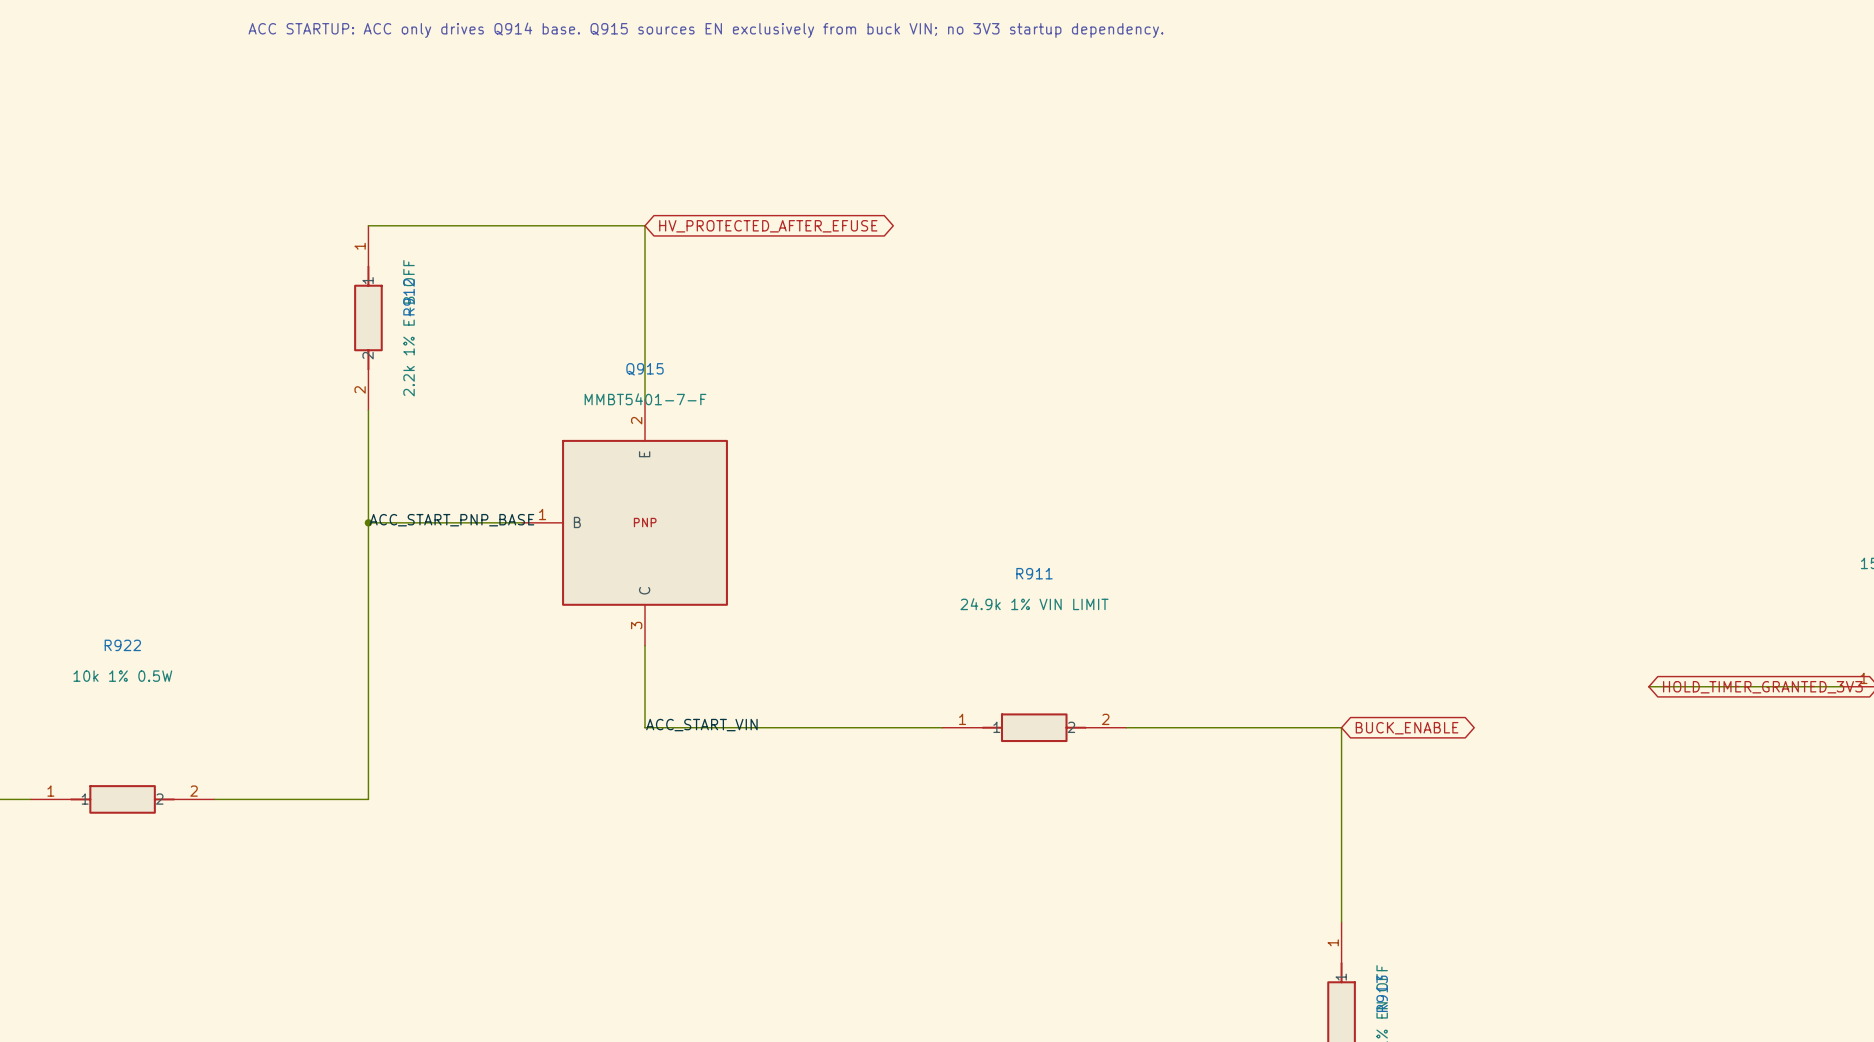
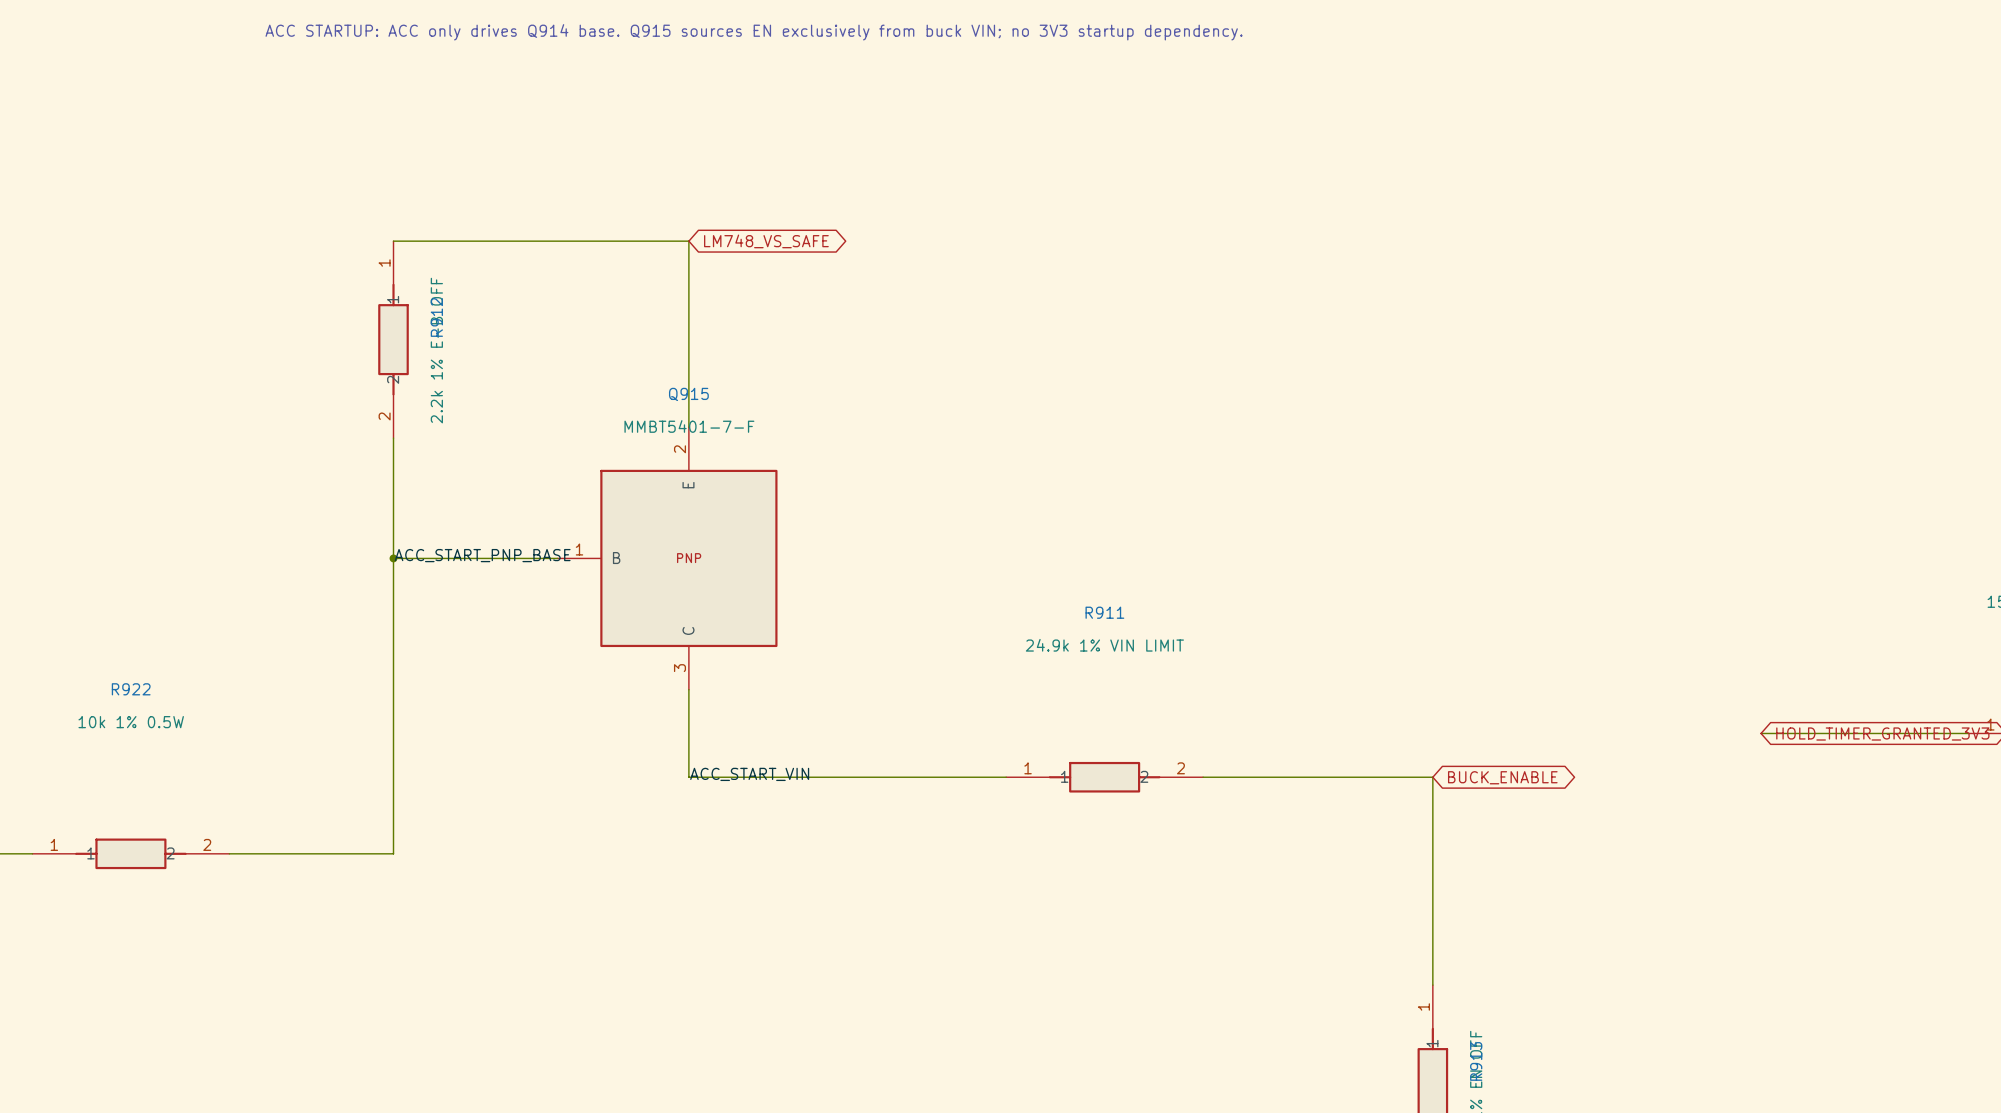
global label: HV_PROTECTED_AFTER_EFUSE (768, 226) -> LM748_VS_SAFE (766, 241)

